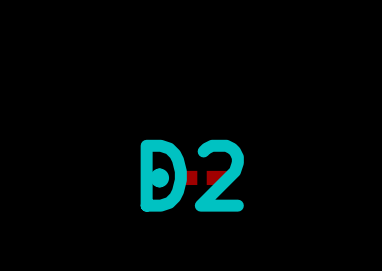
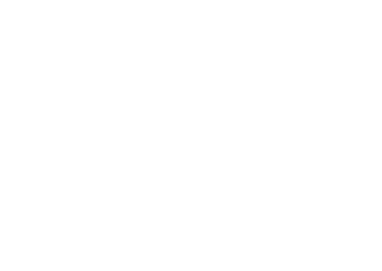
D2: (188, 177) -> none

